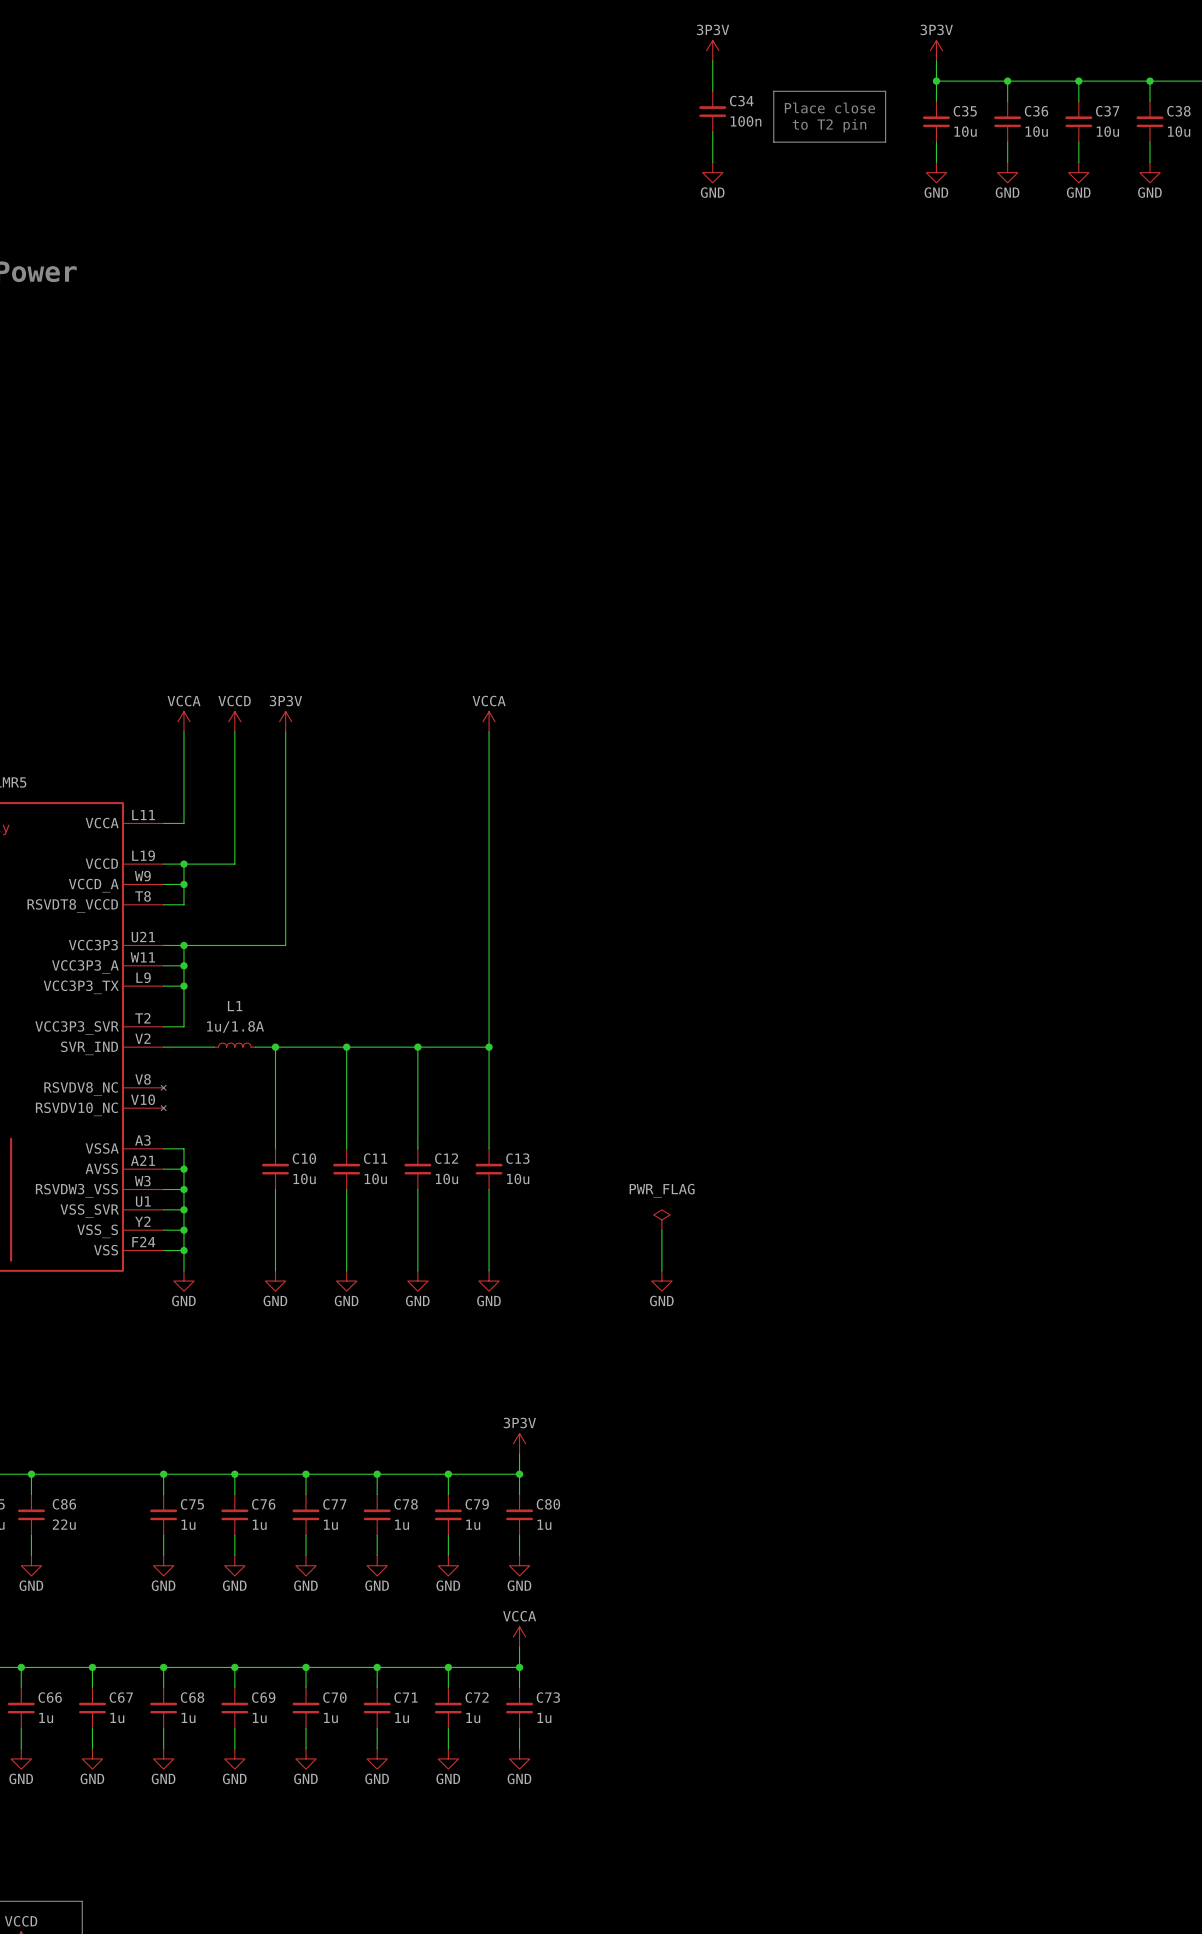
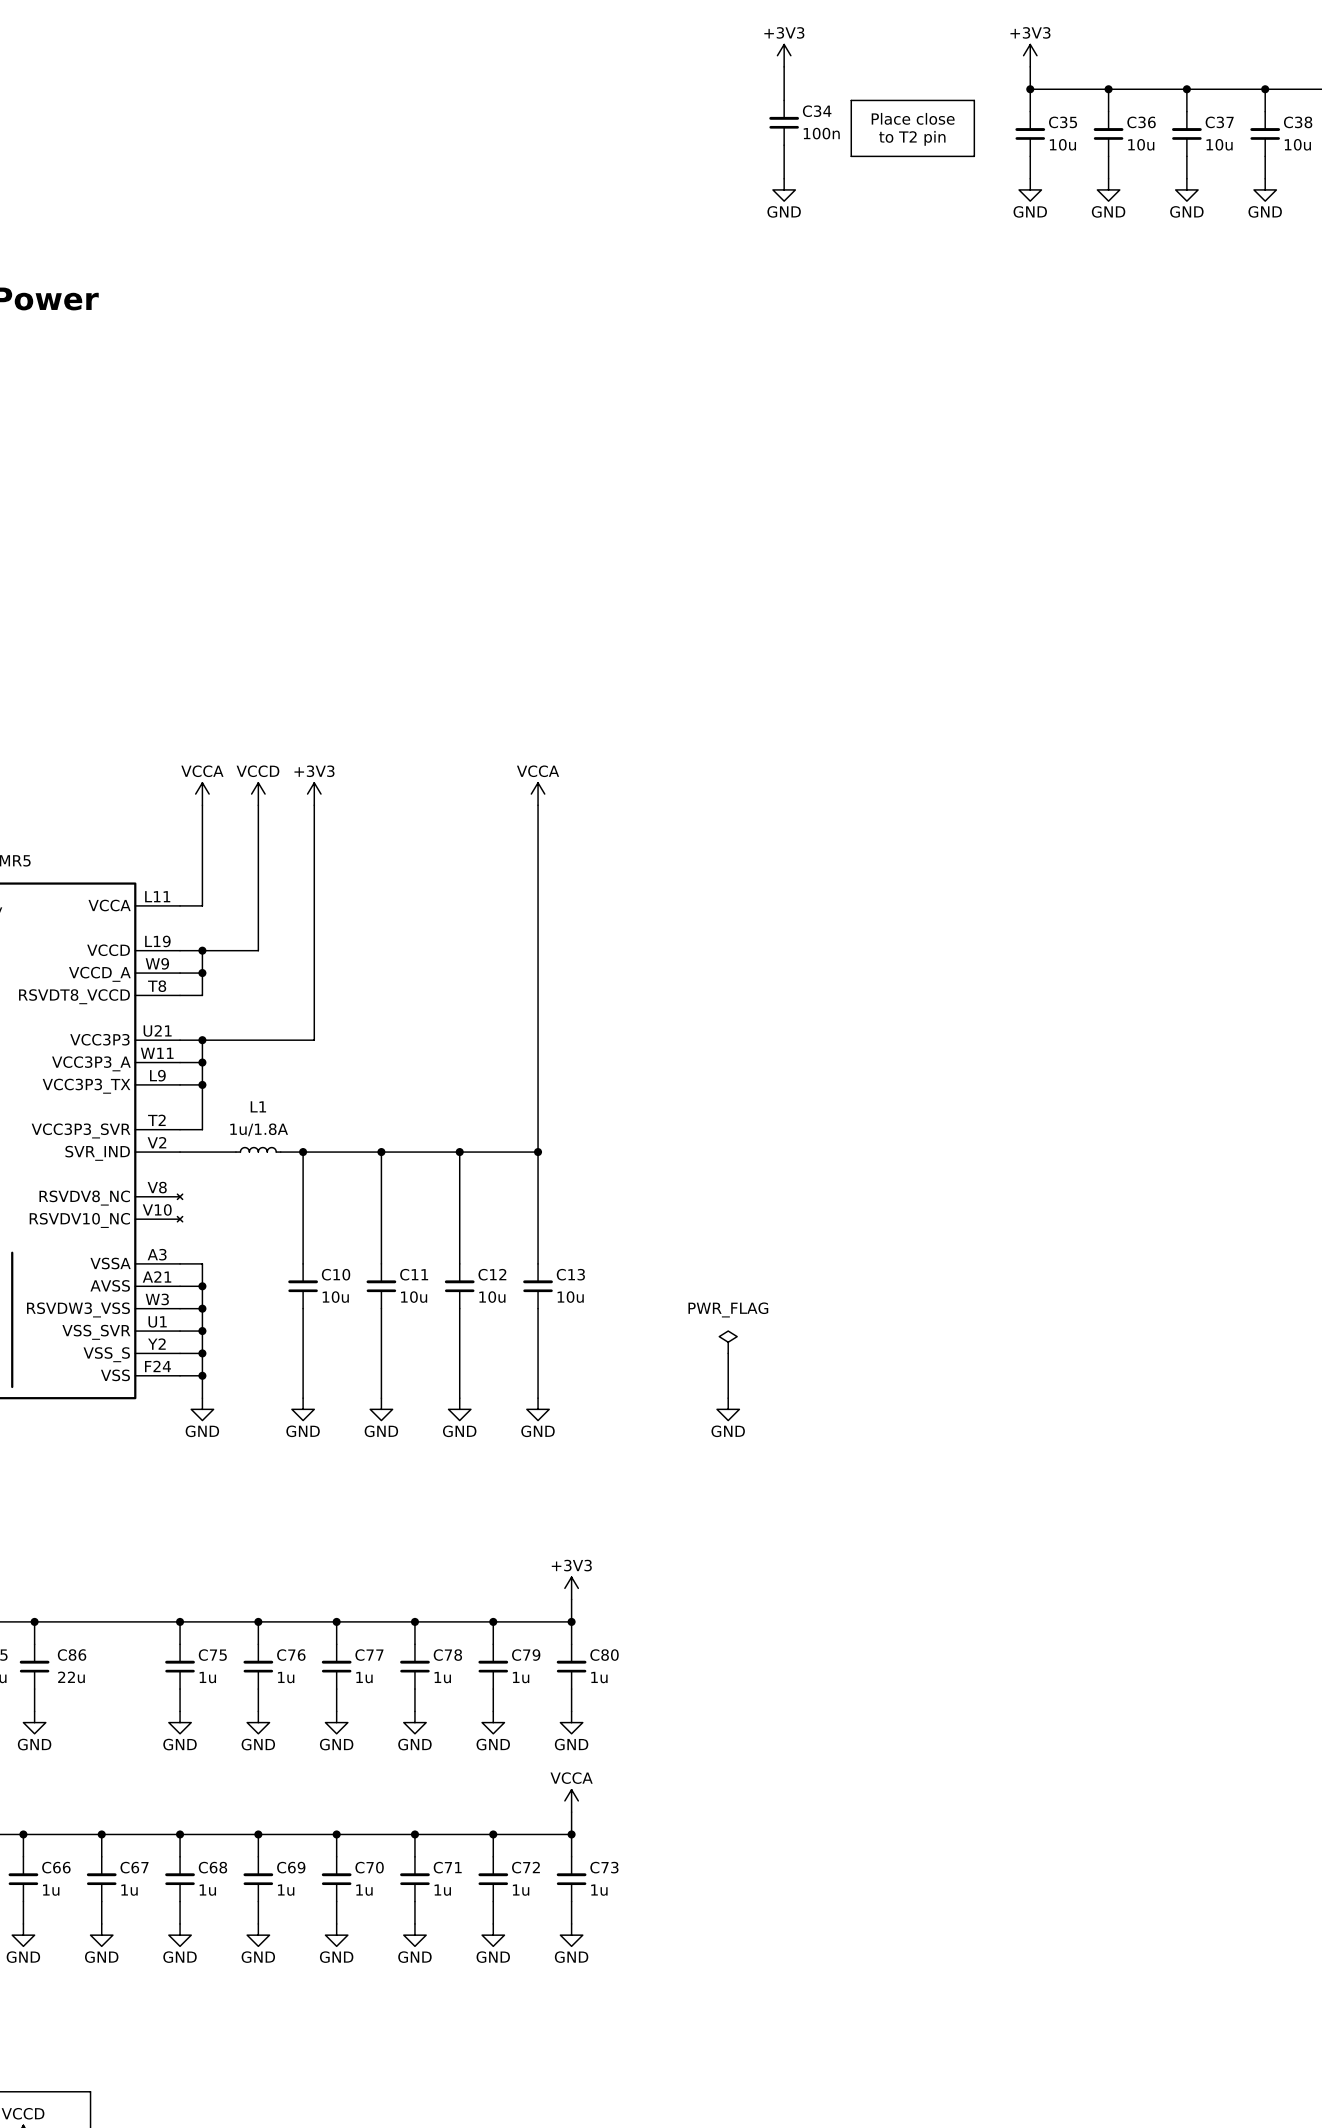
power symbol: 3P3V (712, 50) -> +3V3 (784, 55)
power symbol: 3P3V (936, 50) -> +3V3 (1030, 55)
power symbol: 3P3V (285, 721) -> +3V3 (314, 794)
power symbol: 3P3V (519, 1443) -> +3V3 (571, 1588)

